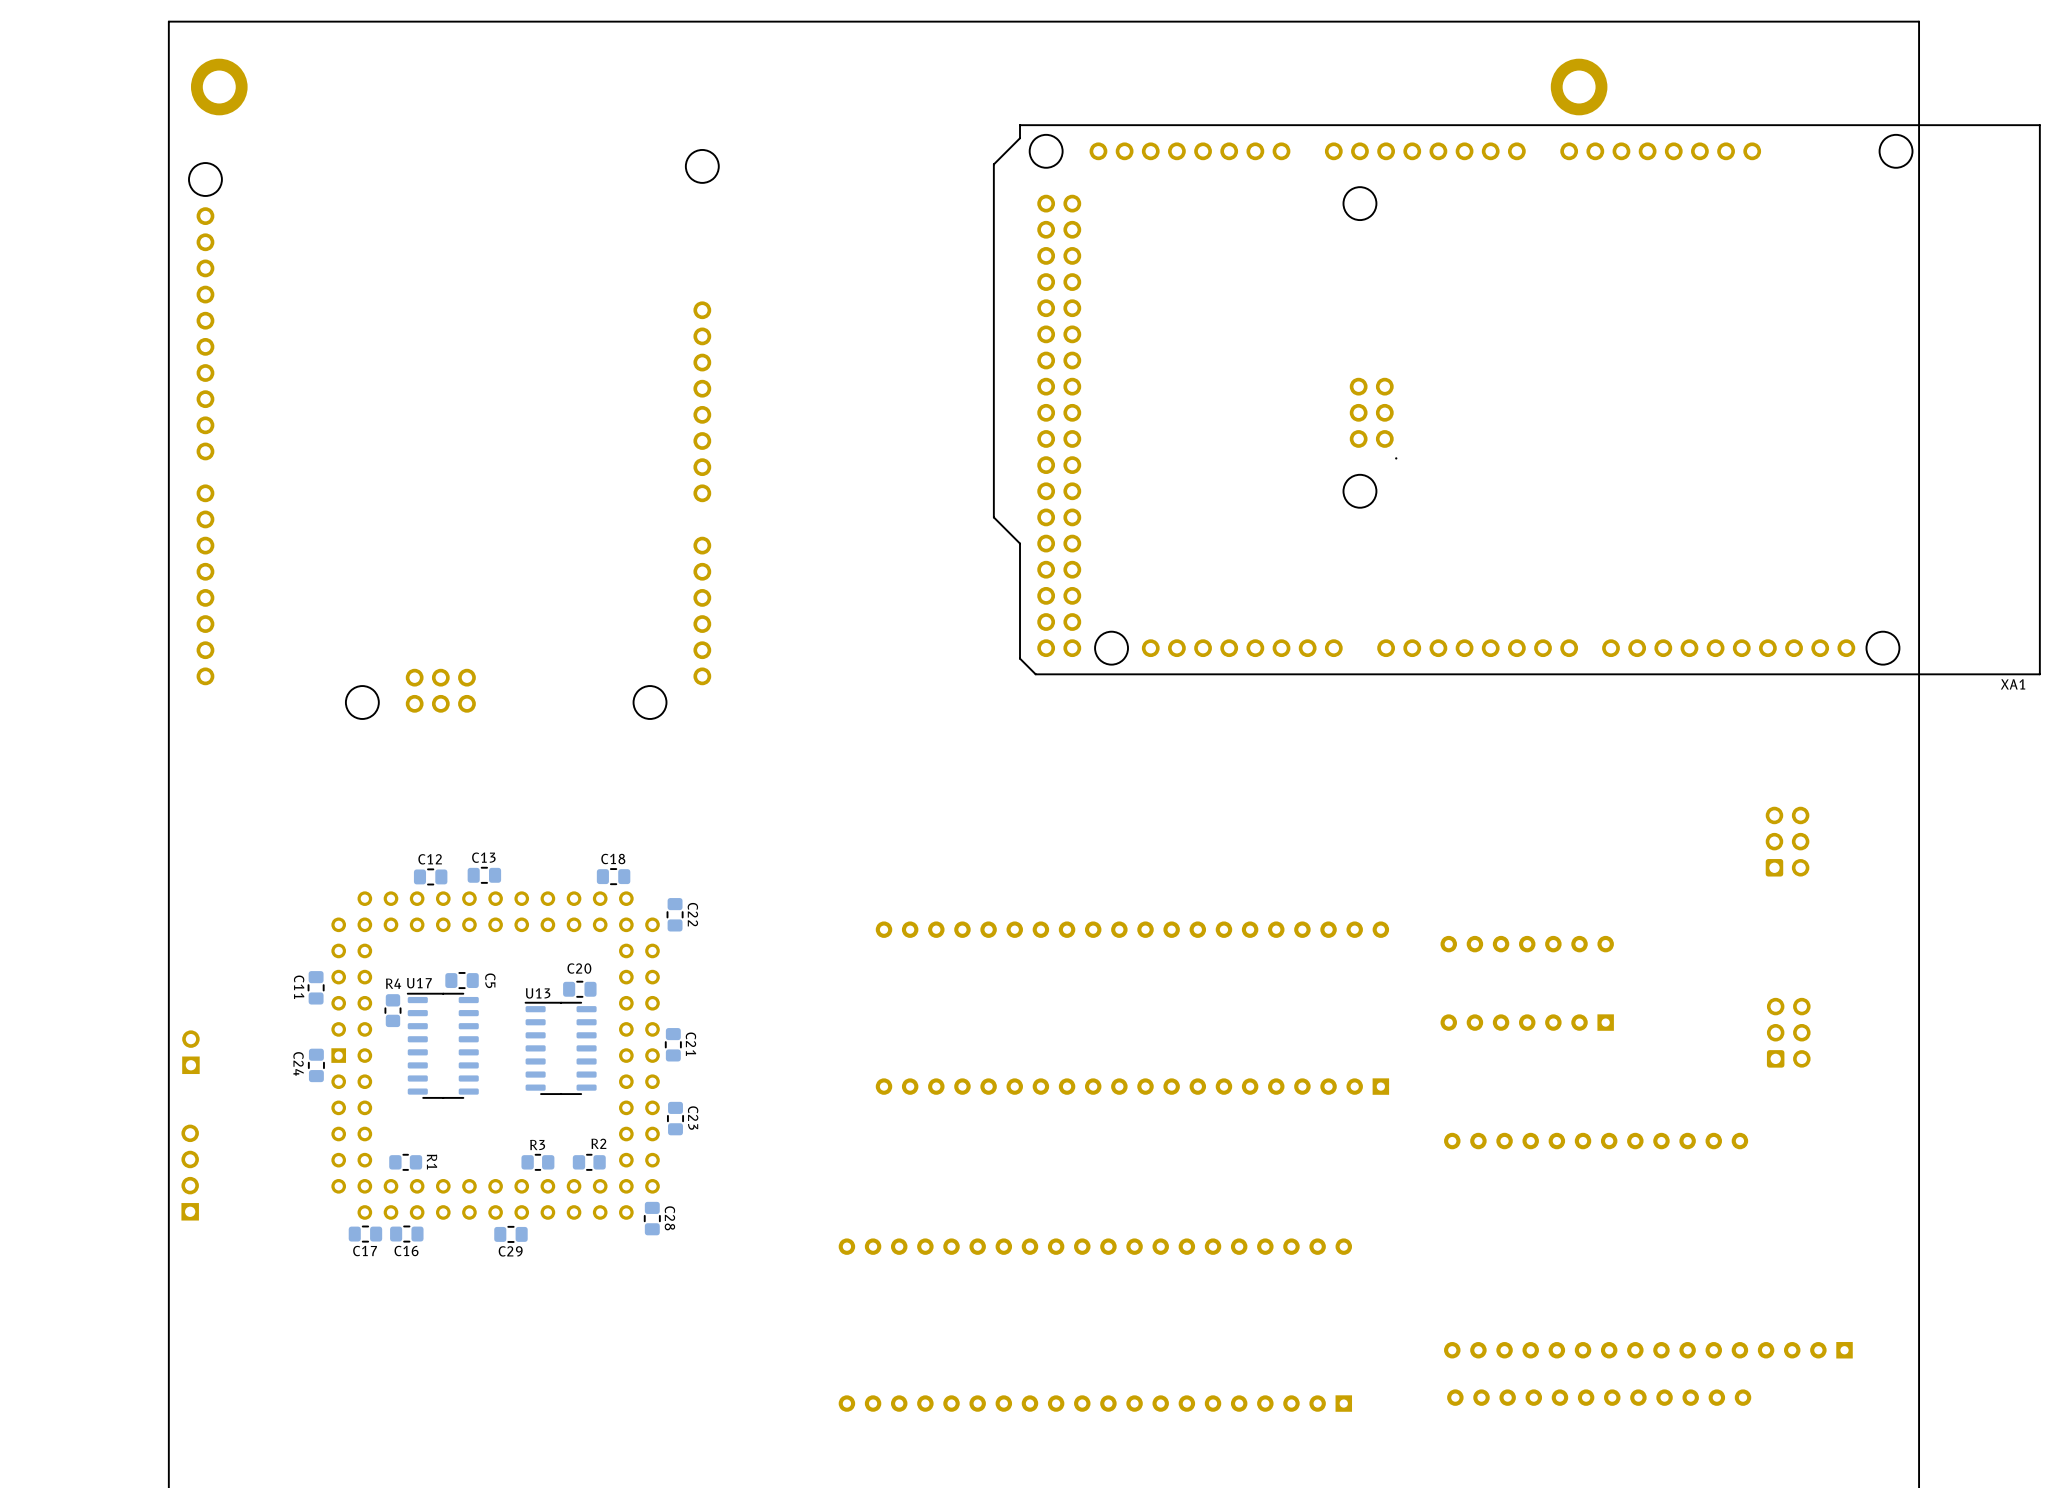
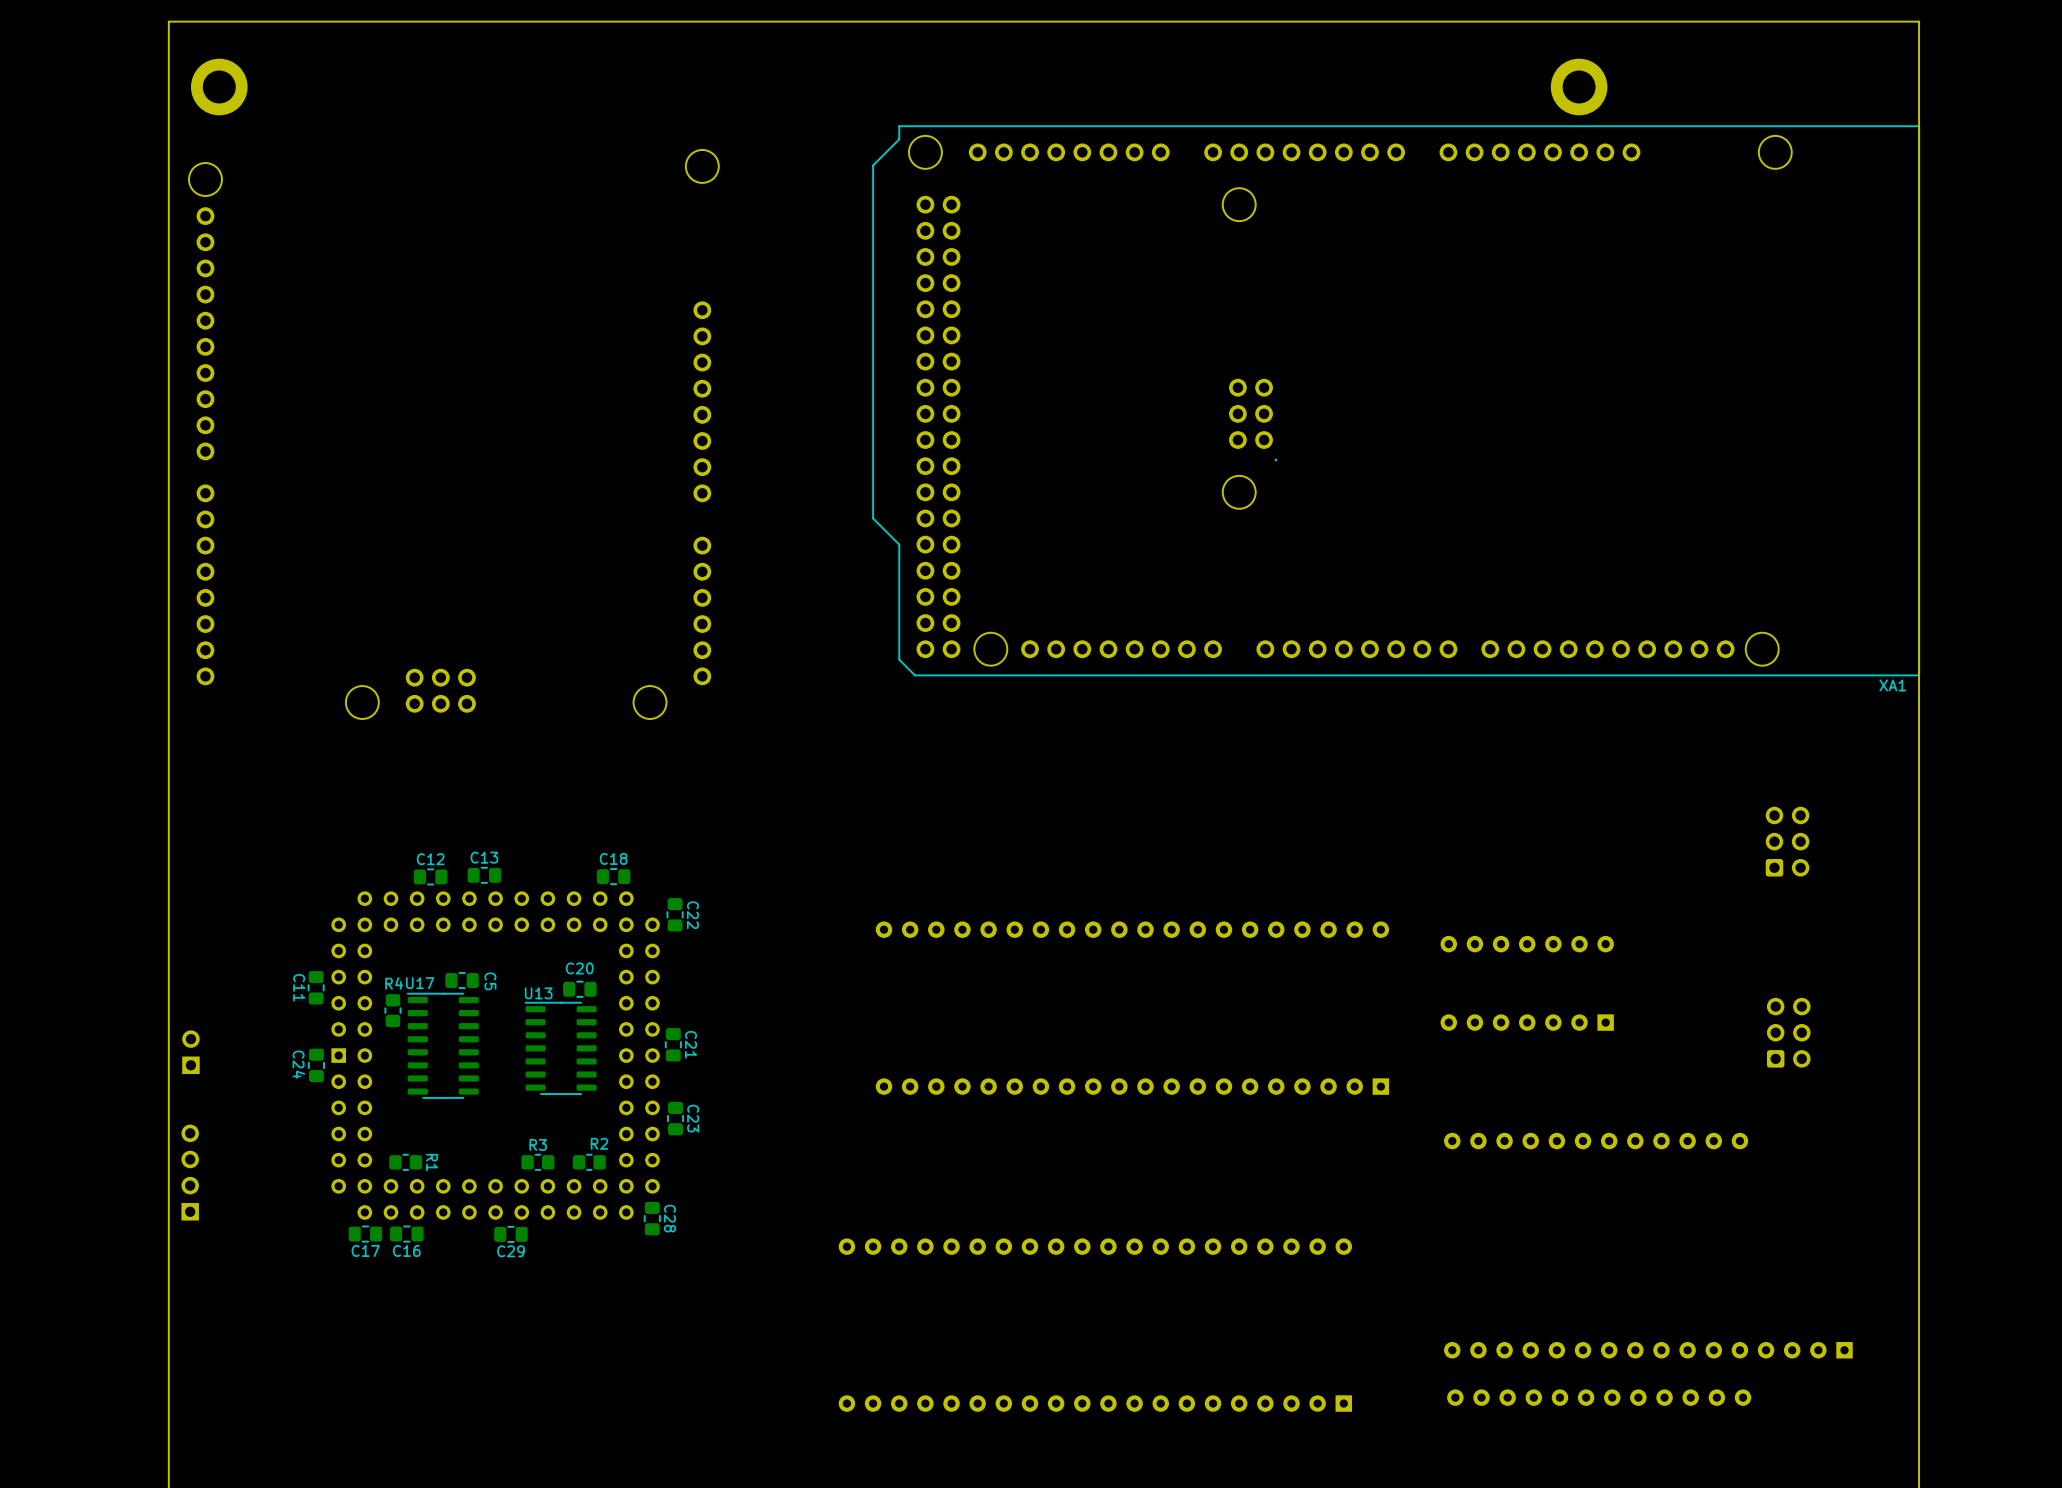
XA1 position: (1516, 399) -> (1396, 400)

